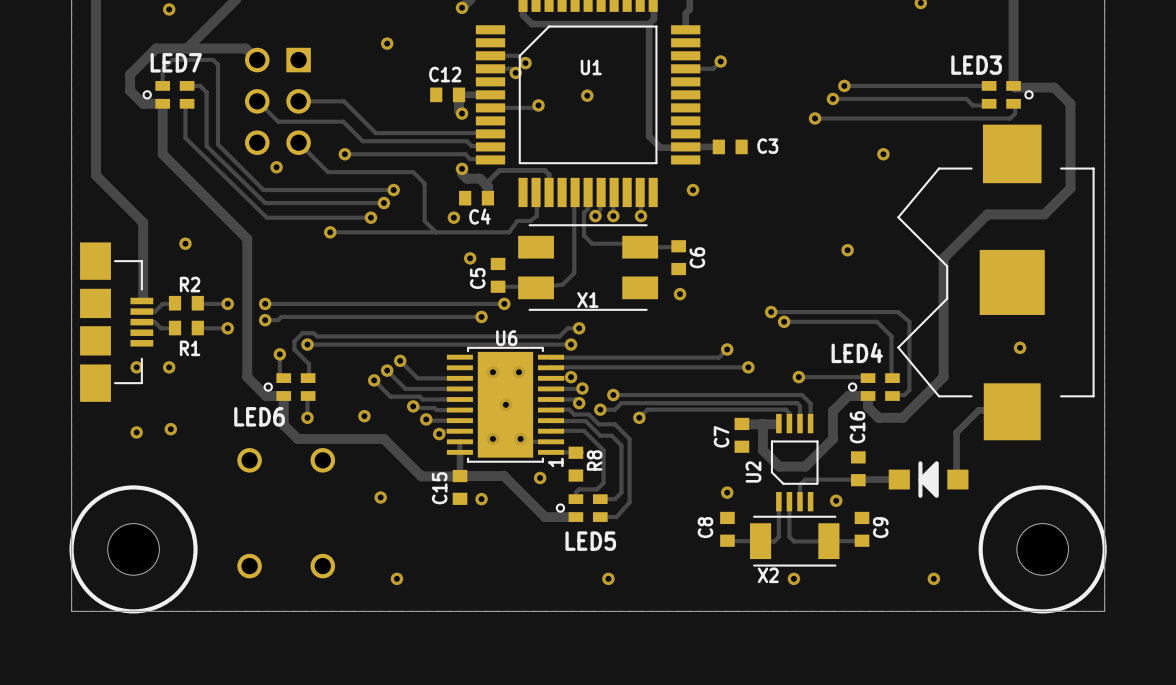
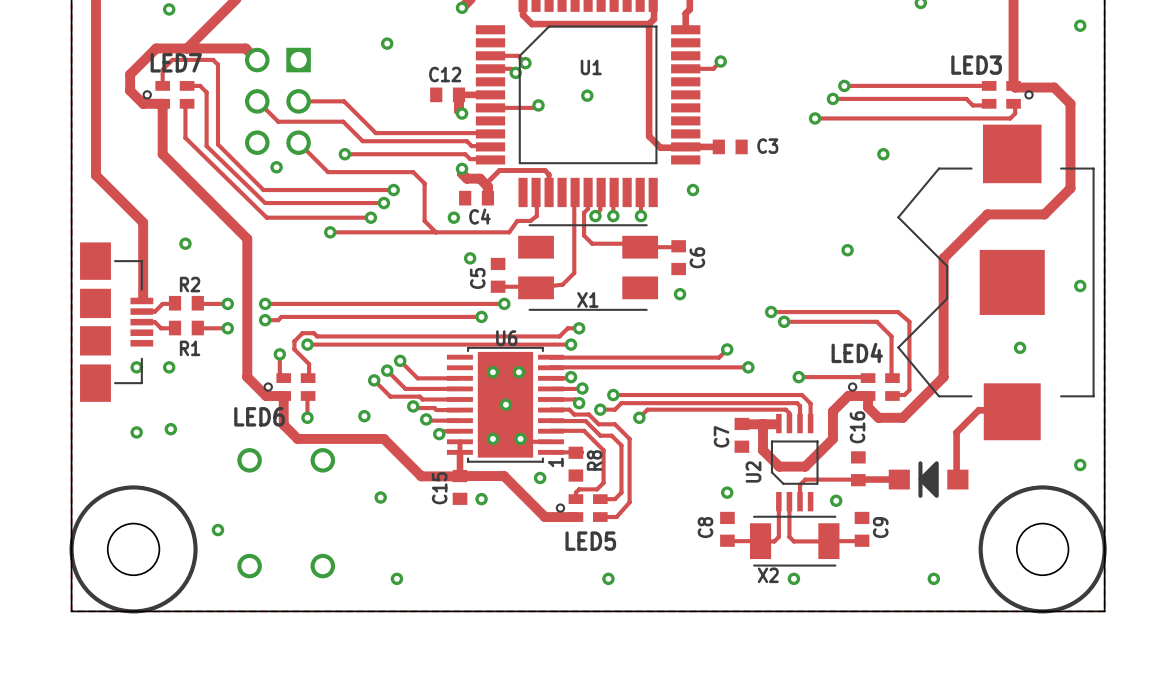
via: none -> (1080, 25)
via: none -> (1080, 286)
via: none -> (1080, 464)
via: none -> (218, 530)

